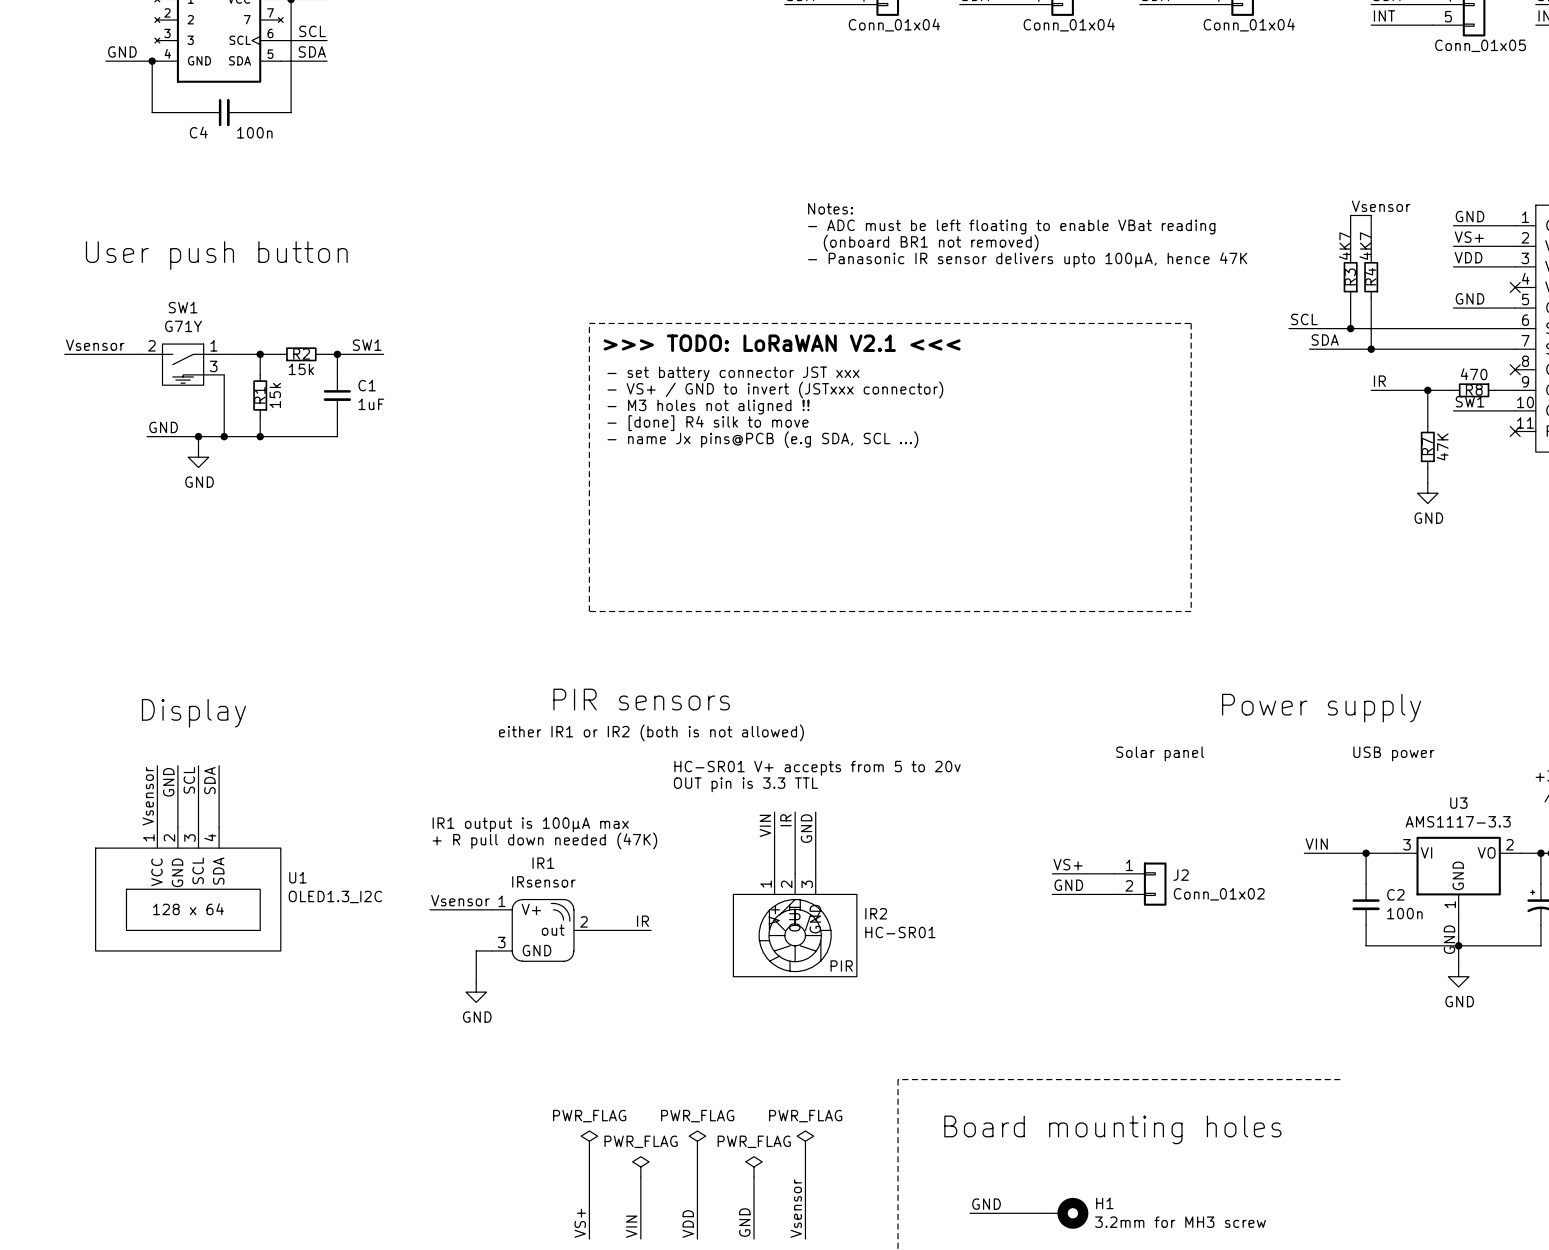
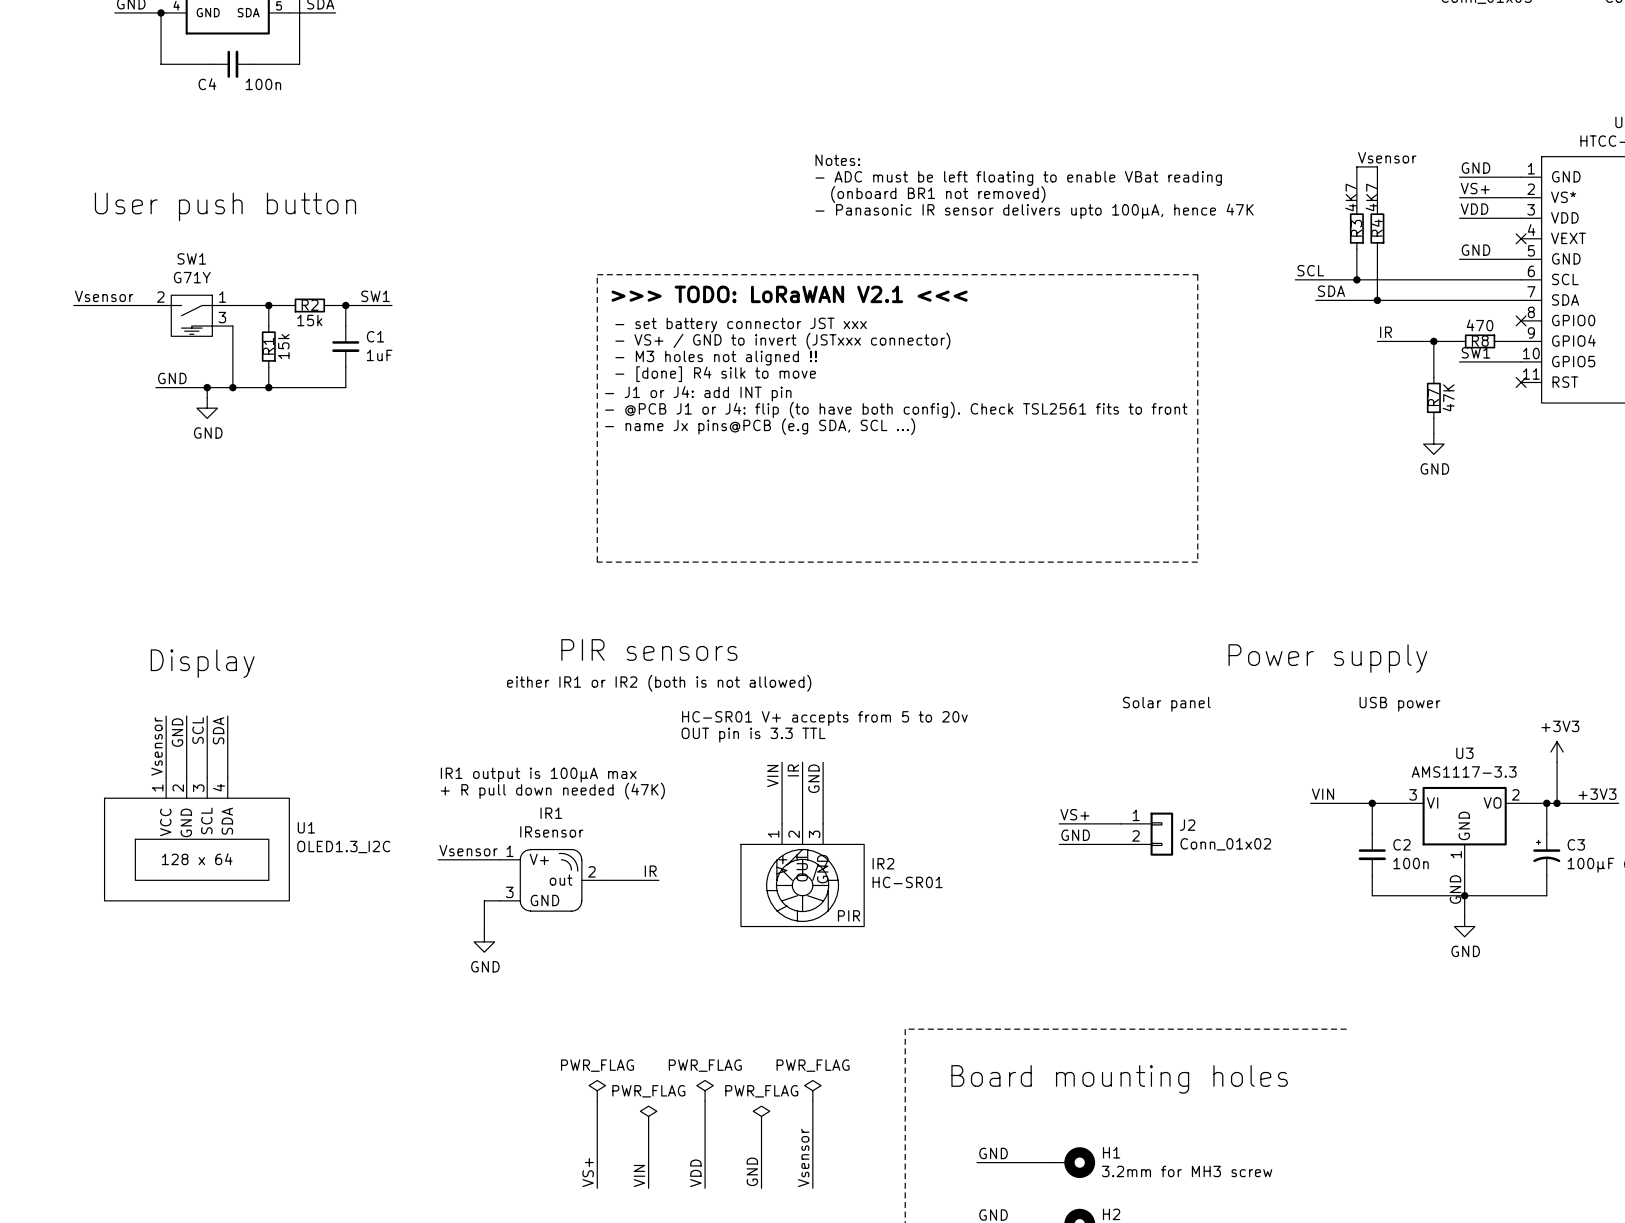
text position: - name Jx pins@PCB (e.g SDA, SCL ...) (762, 439) -> - name Jx pins@PCB (e.g SDA, SCL ...) (760, 426)
text: none -> - J1 or J4: add INT pin (698, 393)
text: none -> - @PCB J1 or J4: flip (to have both config). Check TSL2561 fits to front (896, 410)

